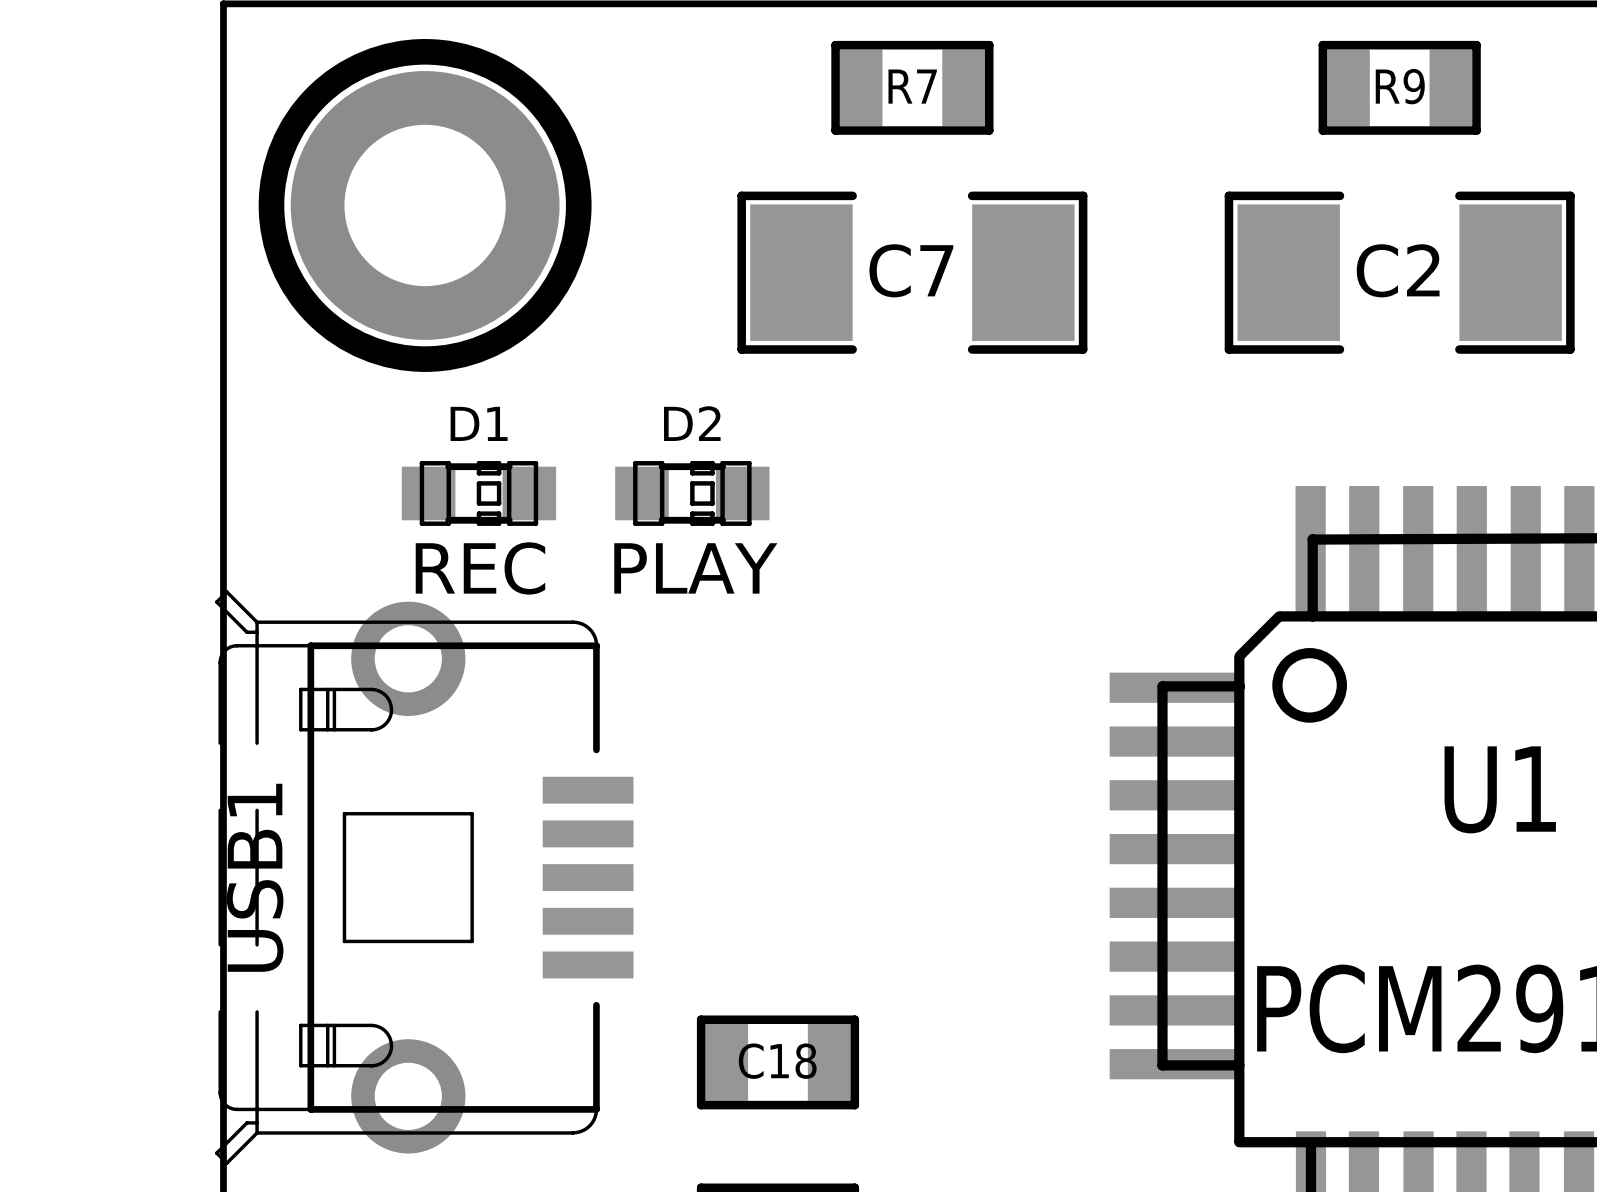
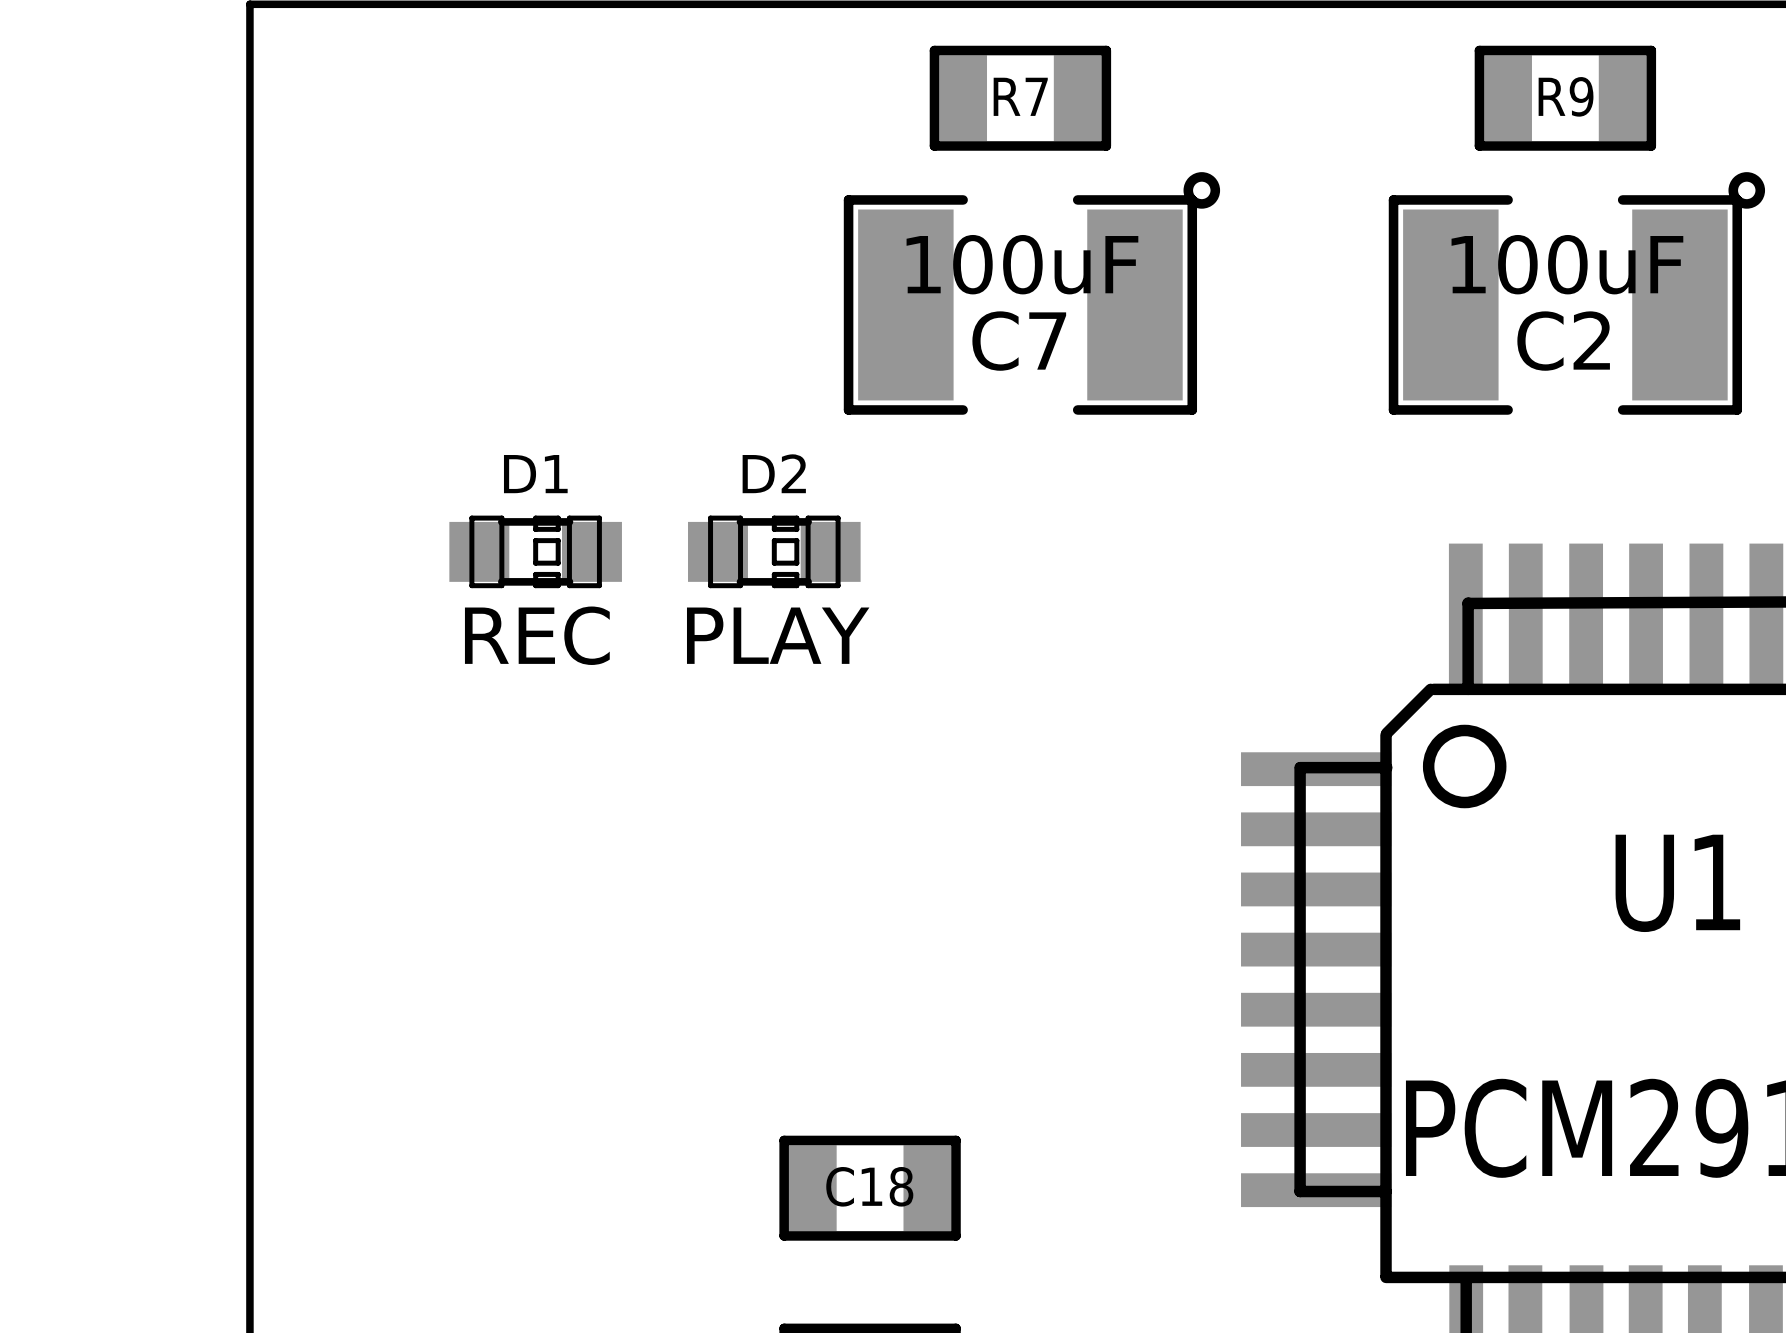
C7 footprint: [737, 191, 1088, 354] -> [843, 172, 1221, 415]
C2 footprint: [1224, 191, 1575, 354] -> [1388, 172, 1766, 415]
part: (425, 205) -> none
C7 value: none -> 100uF (1022, 264)
C2 value: none -> 100uF (1567, 264)
C7 name position: C7 (911, 270) -> C7 (1019, 341)
C2 name position: C2 (1398, 270) -> C2 (1563, 341)
USB1: (424, 877) -> none

